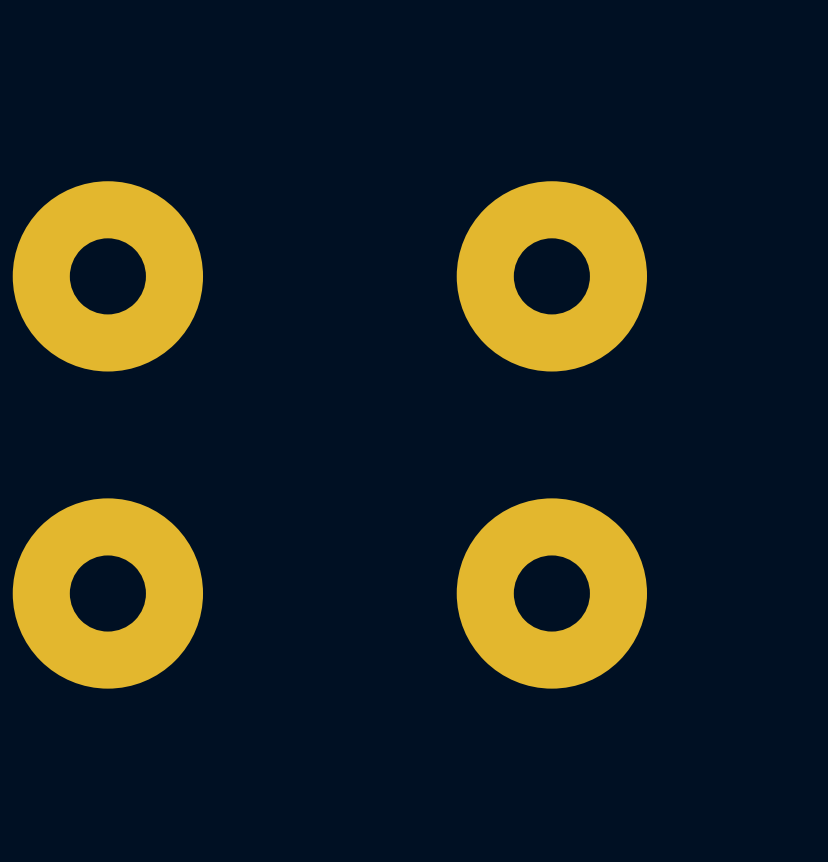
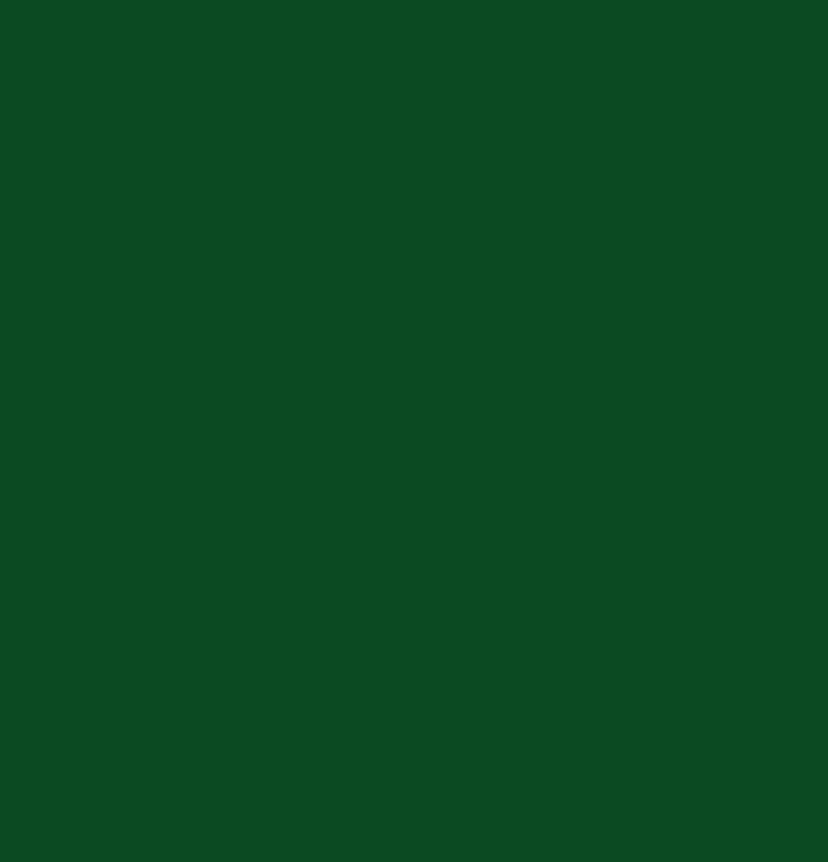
part: (107, 434) -> none
part: (551, 434) -> none

